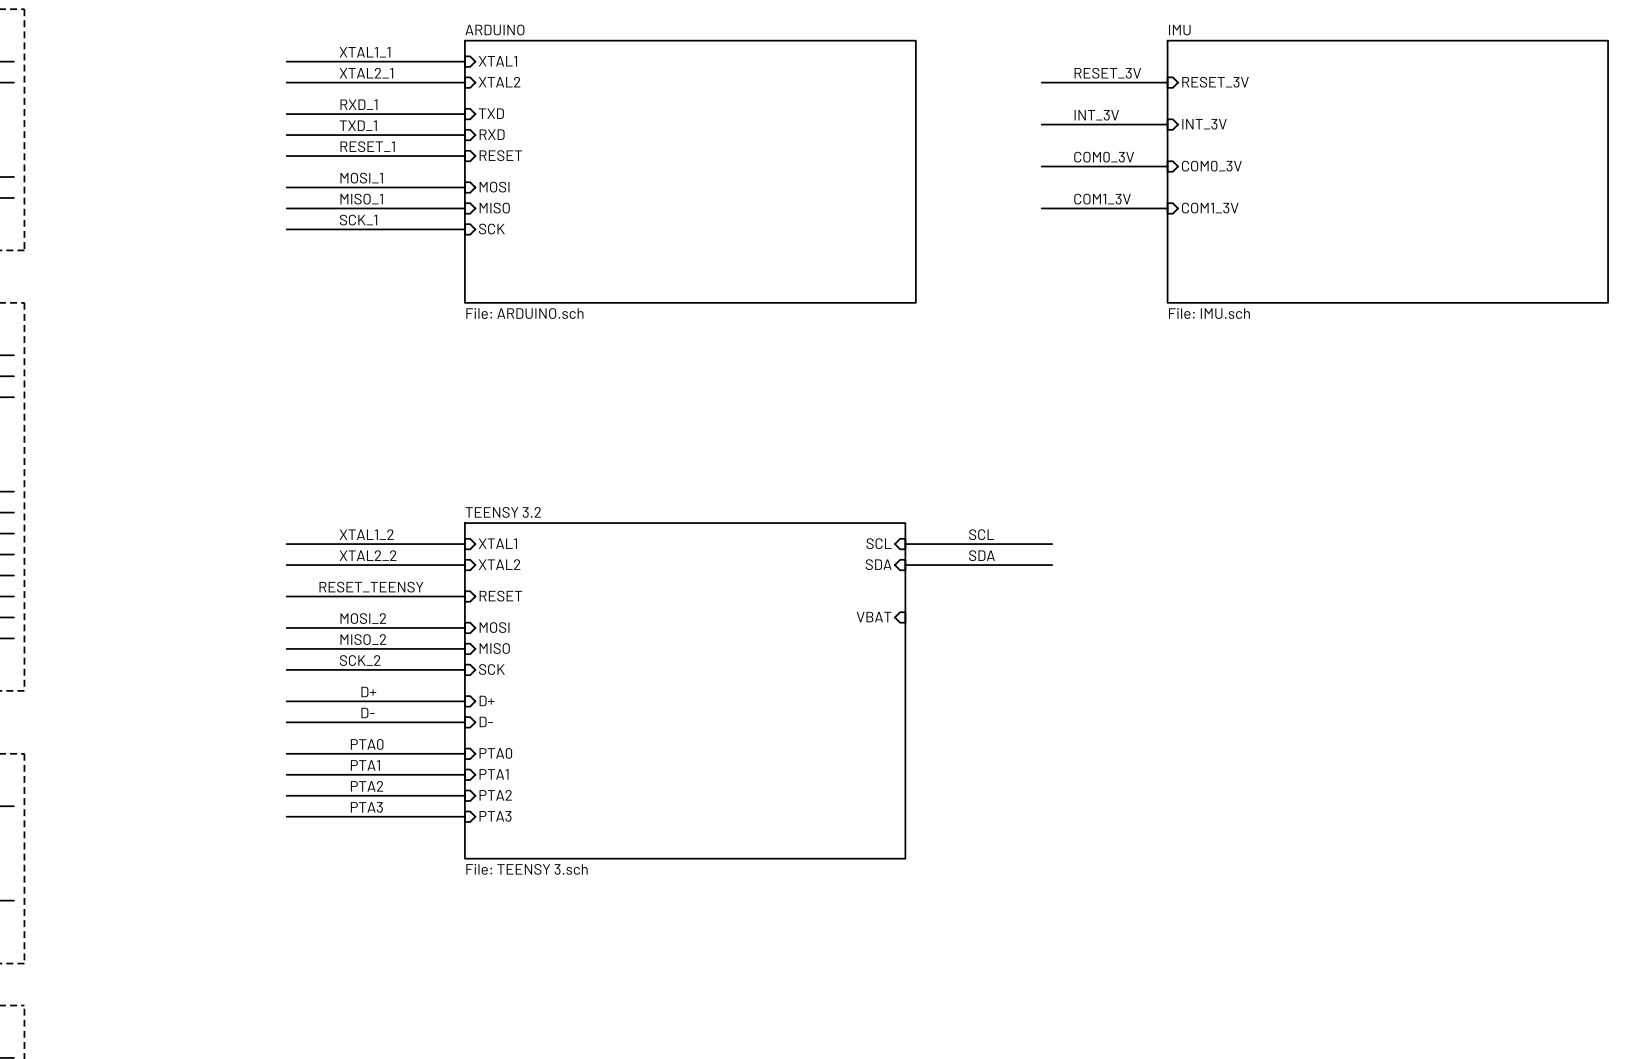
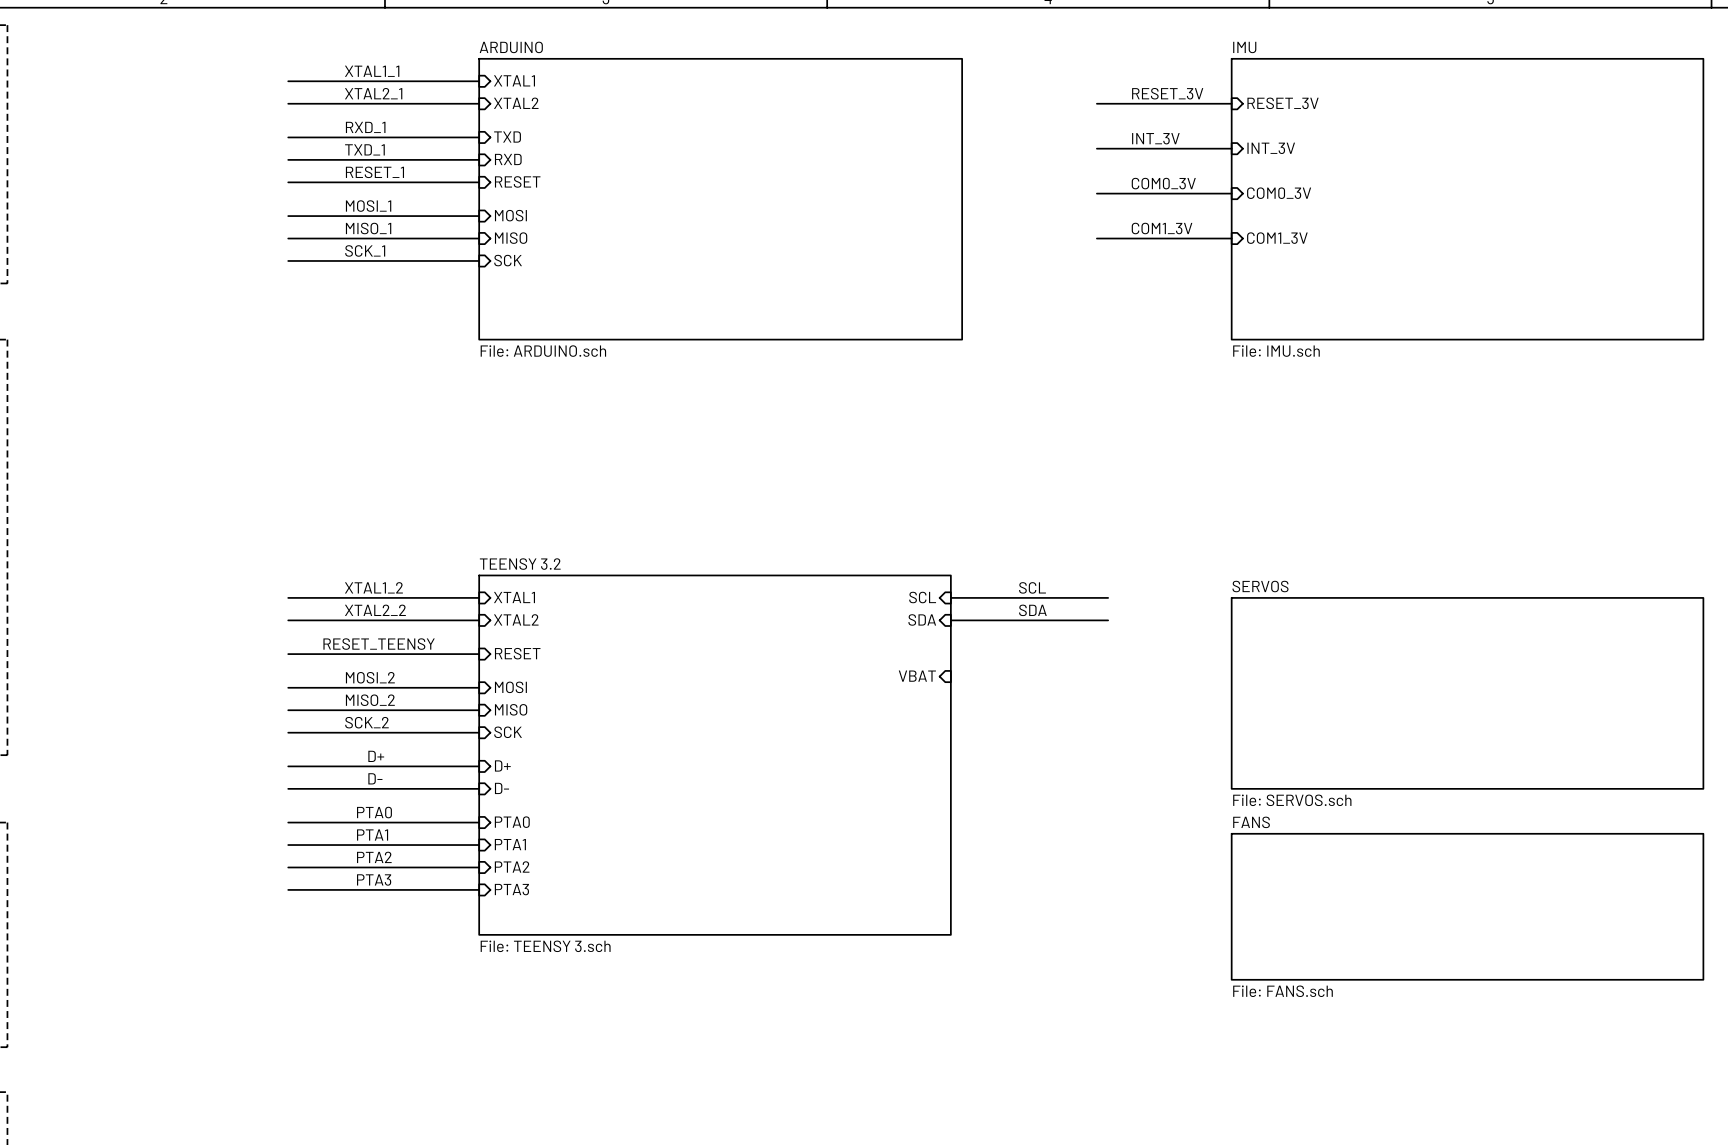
sheet SERVOS: none -> File: SERVOS.sch (1467, 693)
sheet FANS: none -> File: FANS.sch (1467, 906)

